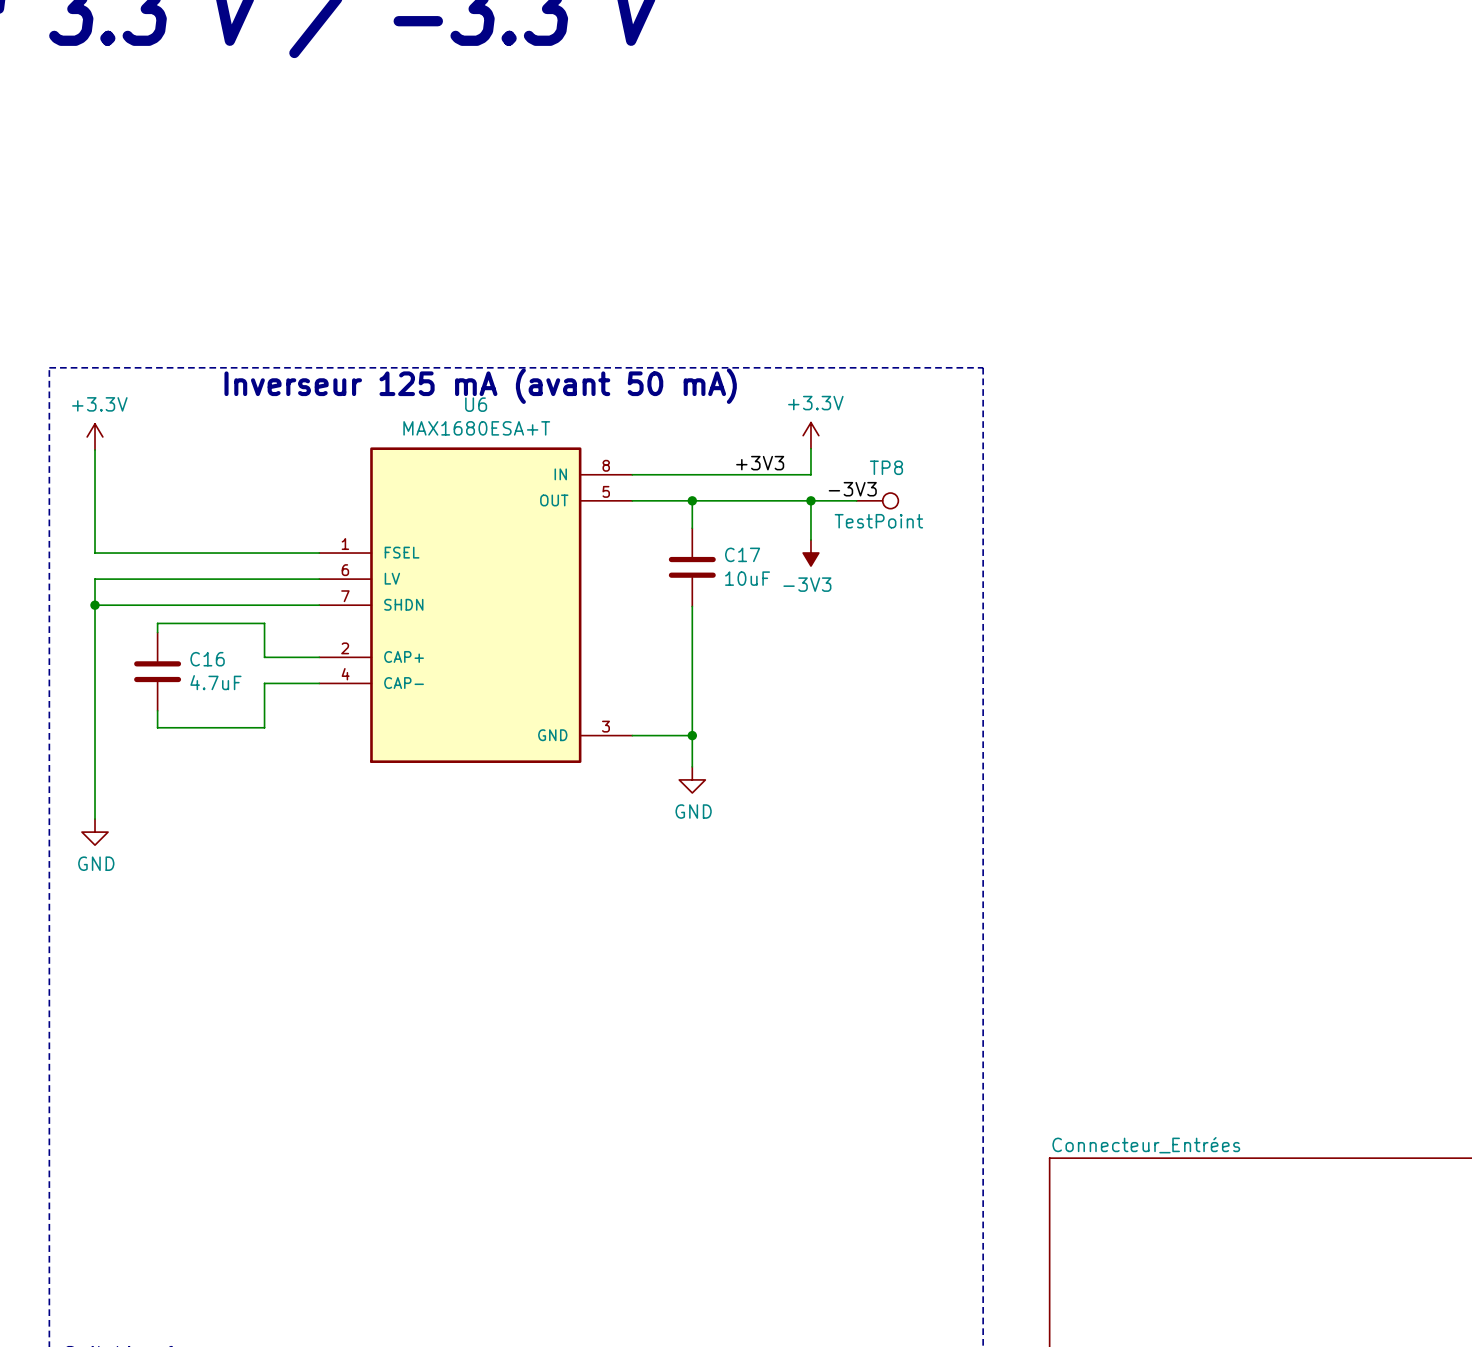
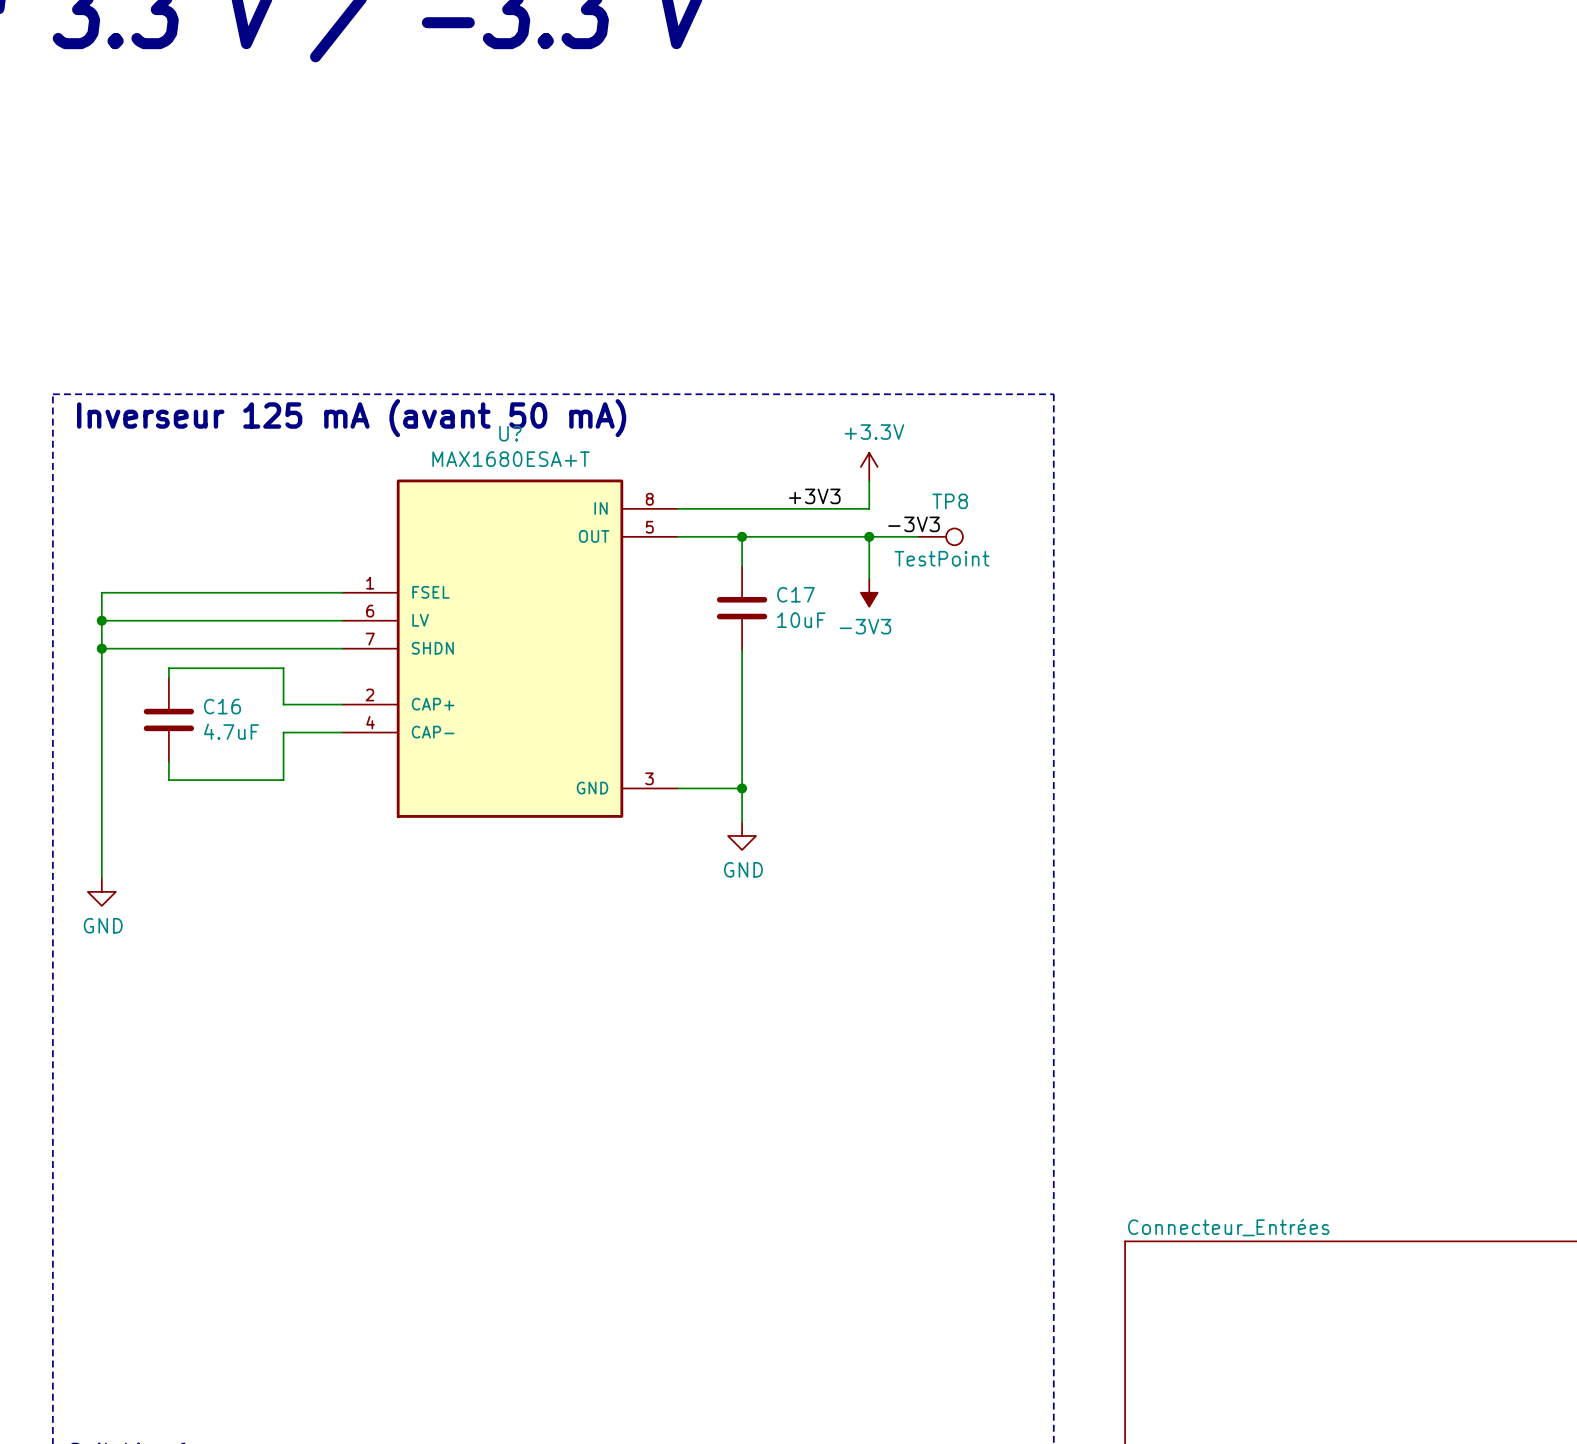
text position: Inverseur 125 mA (avant 50 mA) (480, 386) -> Inverseur 125 mA (avant 50 mA) (351, 418)
U6 name: U6 (476, 404) -> U? (510, 433)
power symbol: +3.3V (95, 436) -> none
wire: (95, 449) (95, 553) -> (101, 620) (101, 592)
junction: none -> (101, 620)

